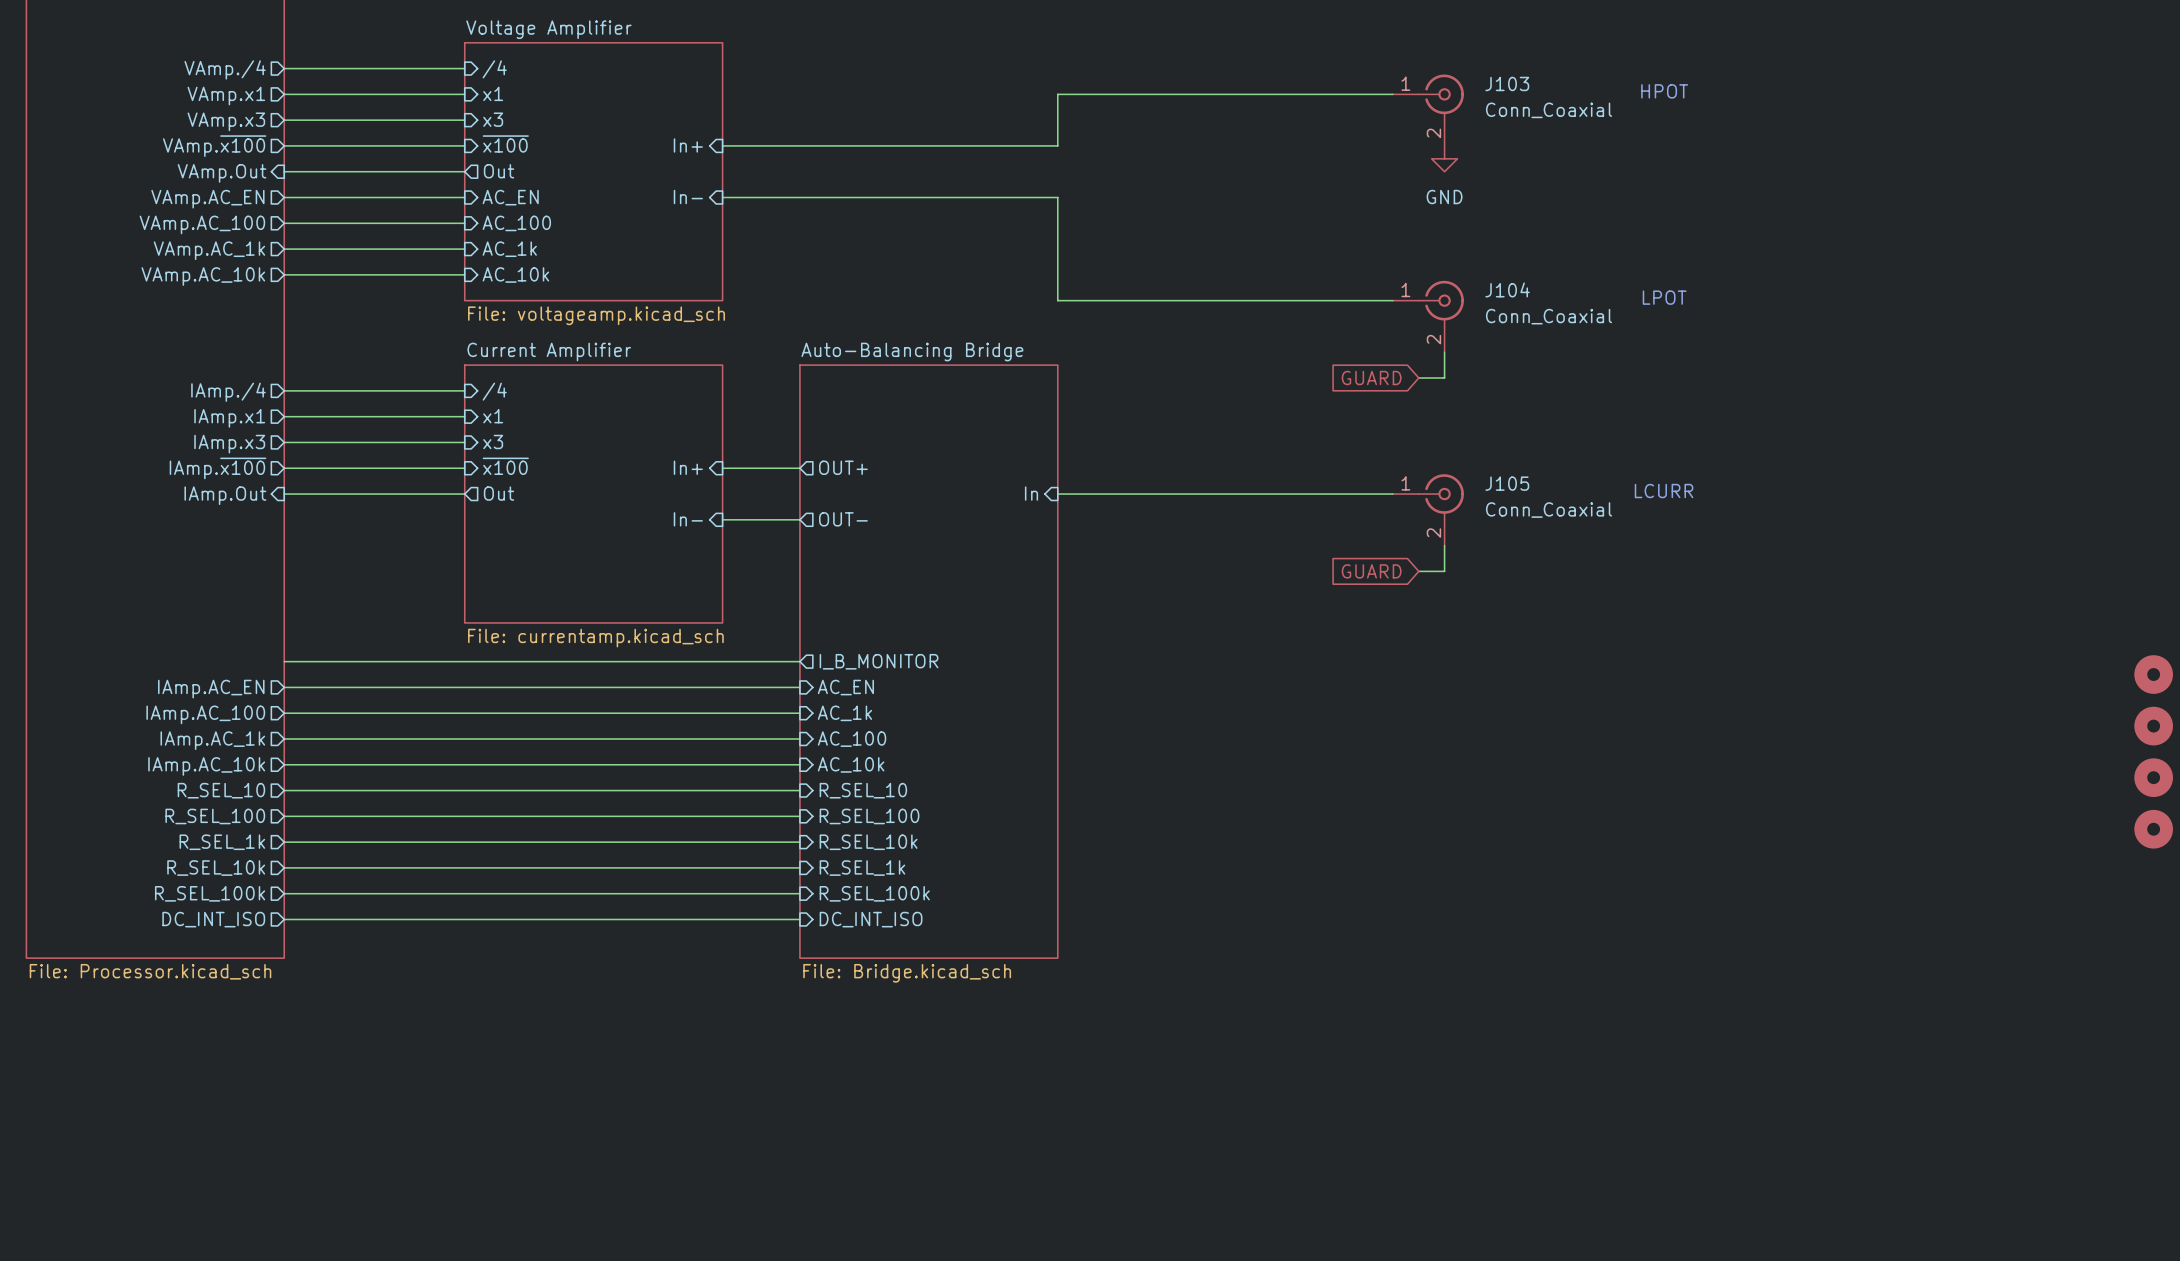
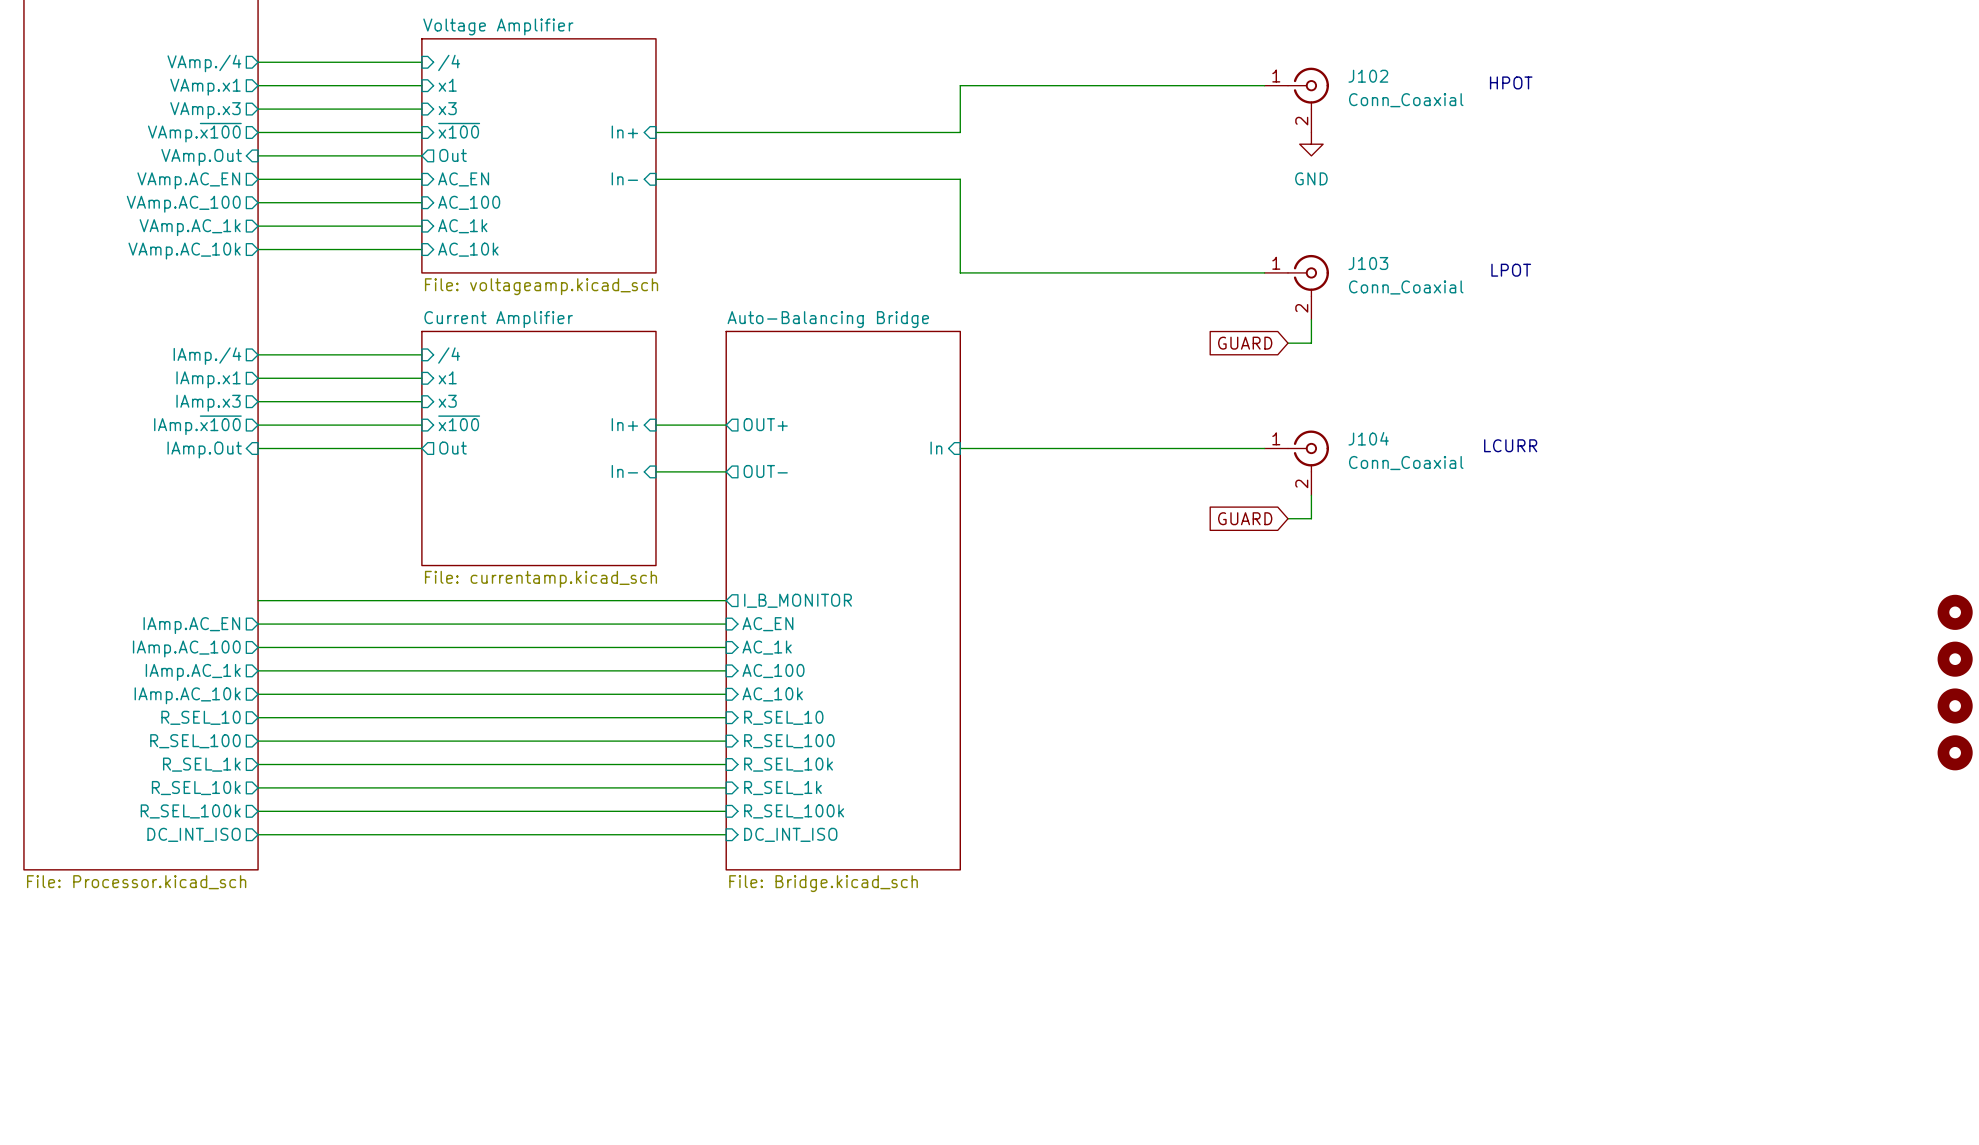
J103 name: J103 (1507, 83) -> J102 (1368, 76)
J104 name: J104 (1507, 289) -> J103 (1368, 263)
J105 name: J105 (1507, 483) -> J104 (1368, 438)

